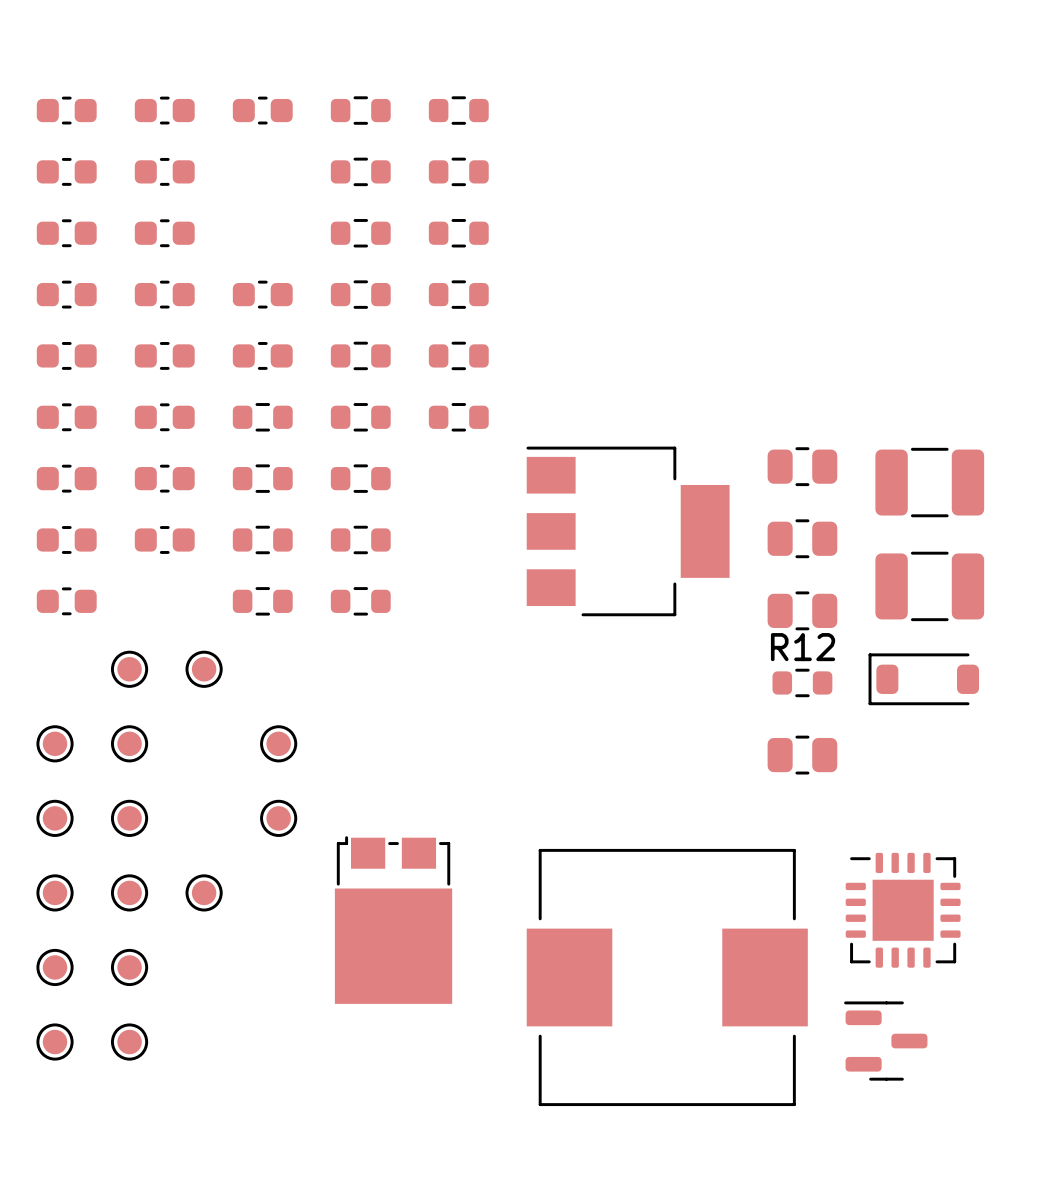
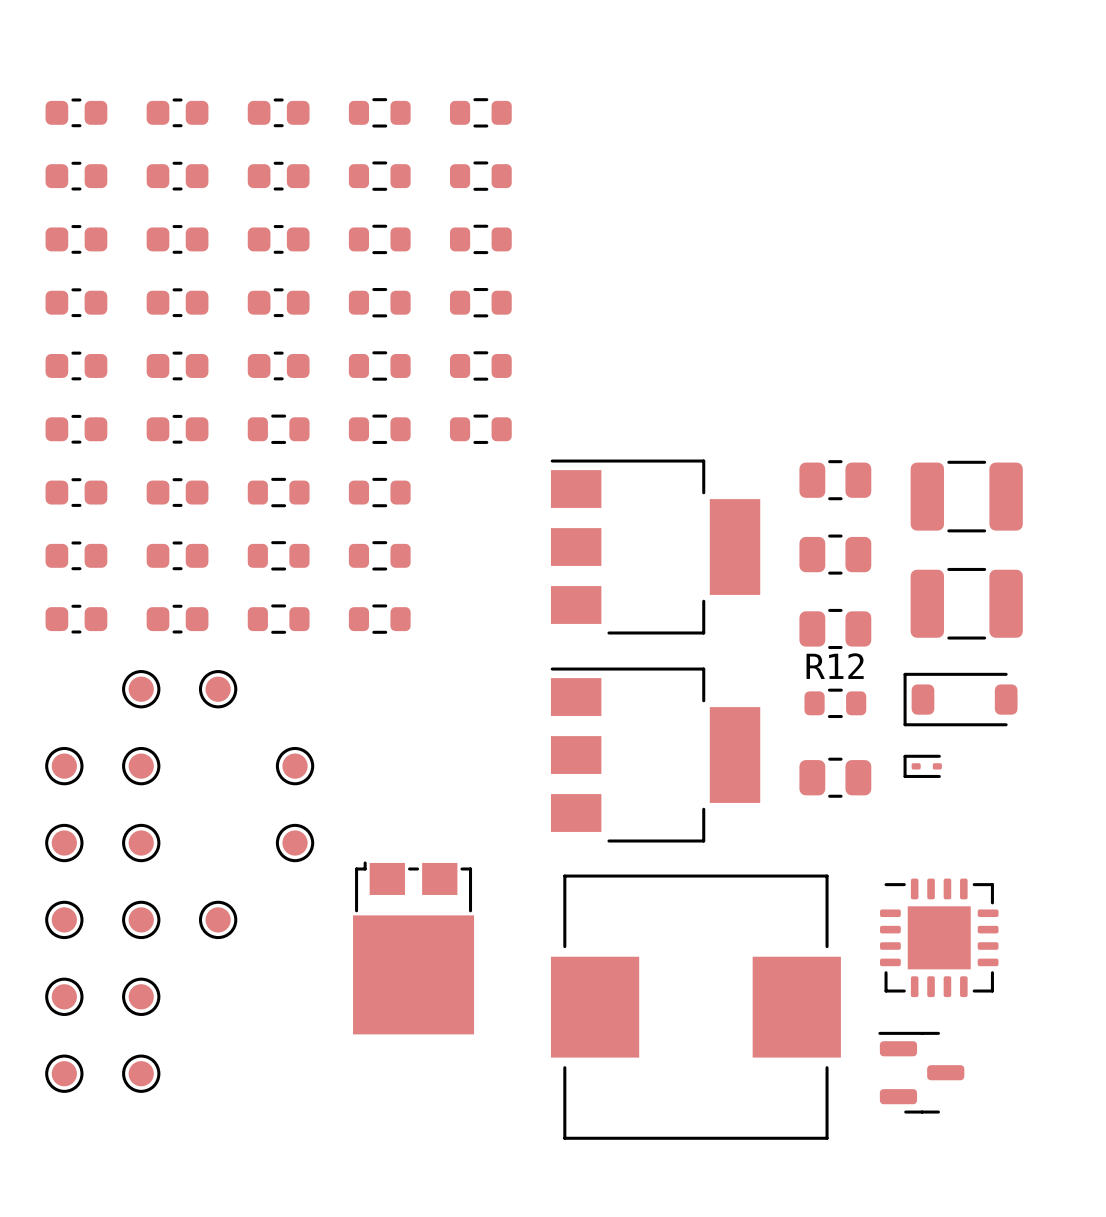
part: none -> (278, 176)
part: none -> (278, 239)
part: none -> (177, 619)
part: none -> (655, 755)
part: none -> (922, 766)

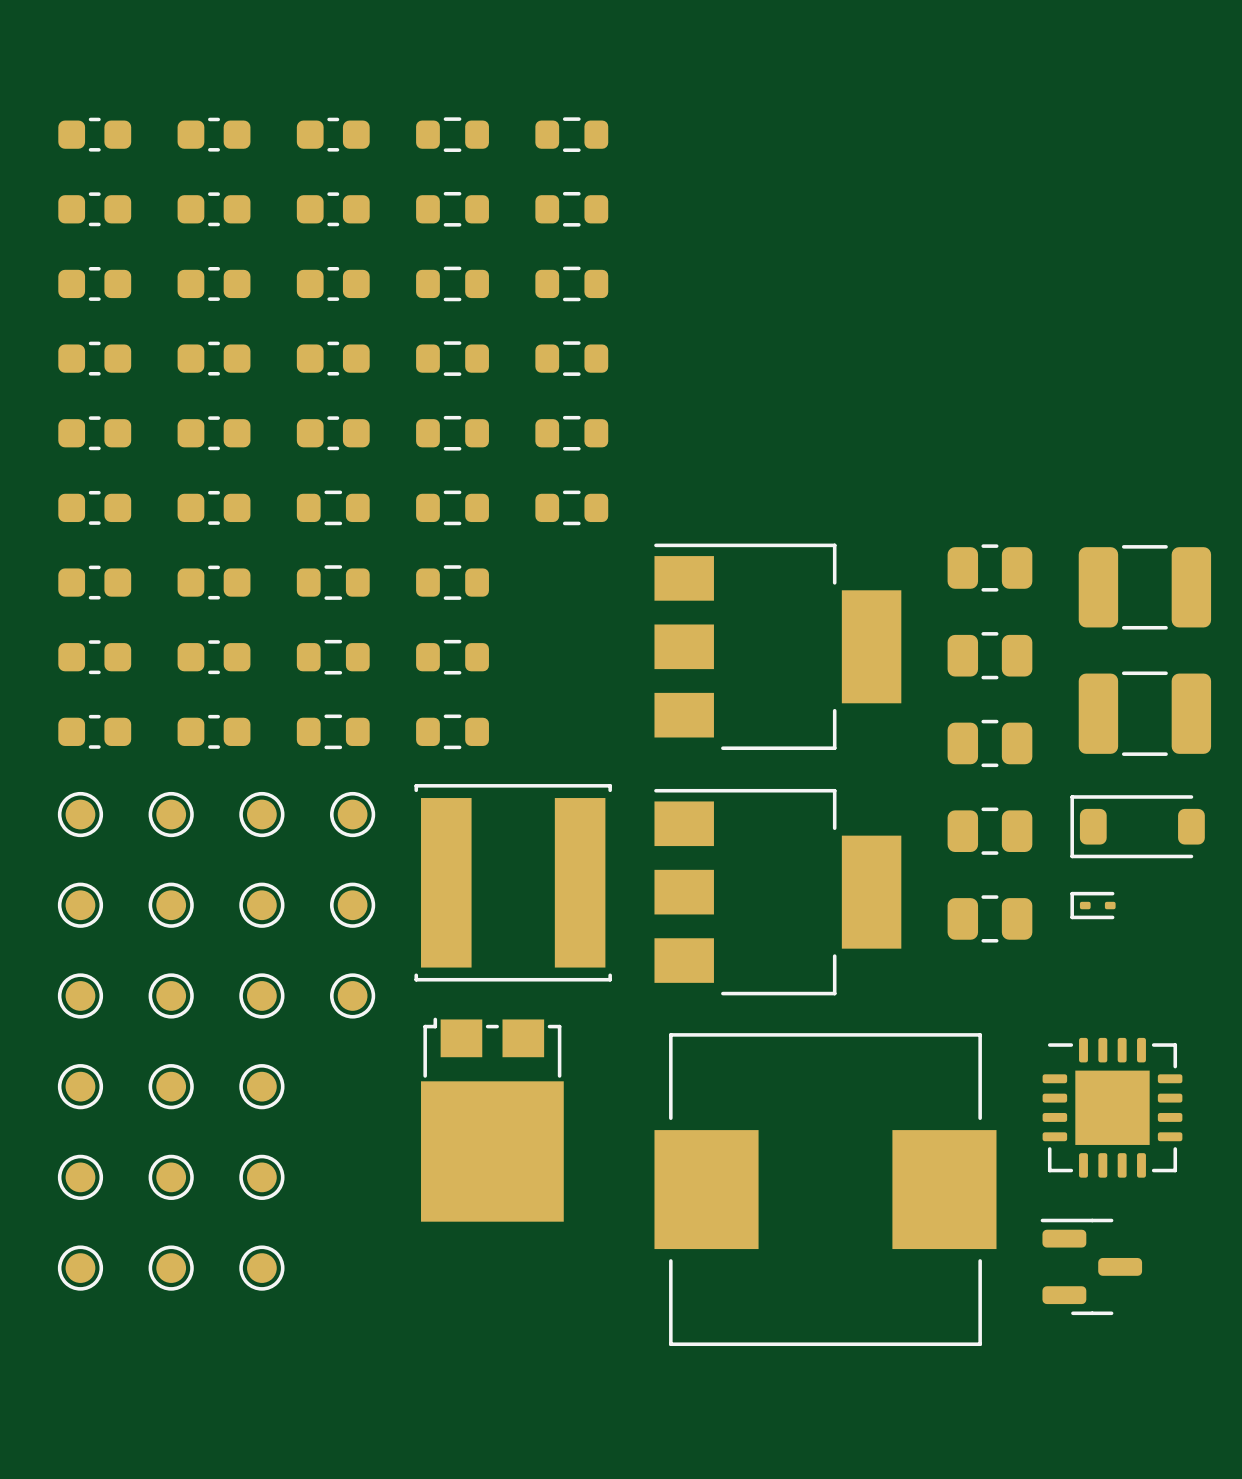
part: none -> (80, 814)
part: none -> (352, 814)
R12: (835, 703) -> none
part: none -> (989, 831)
part: none -> (513, 882)
part: none -> (261, 905)
part: none -> (261, 995)
part: none -> (261, 1177)
part: none -> (261, 1268)

